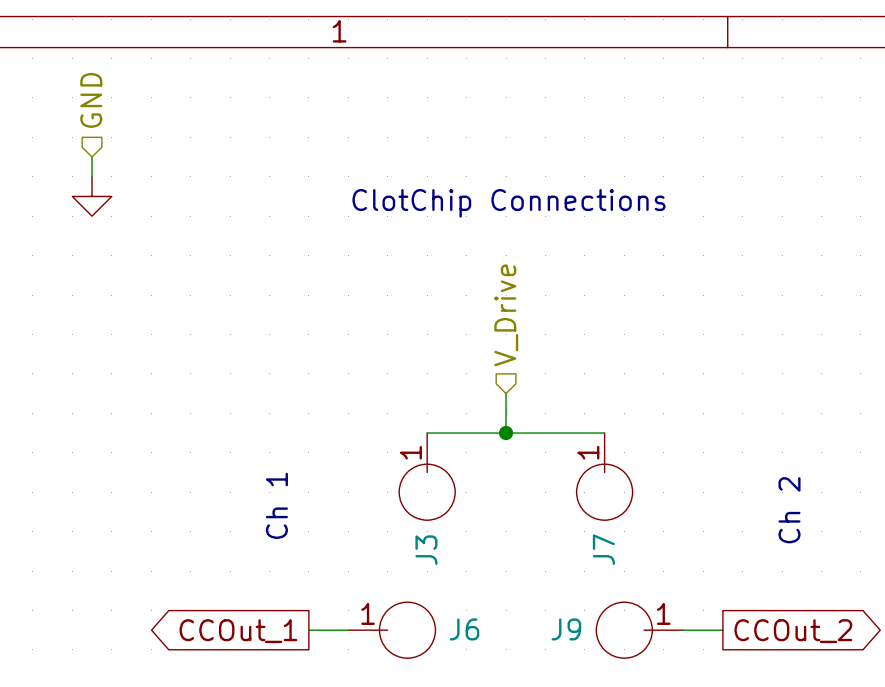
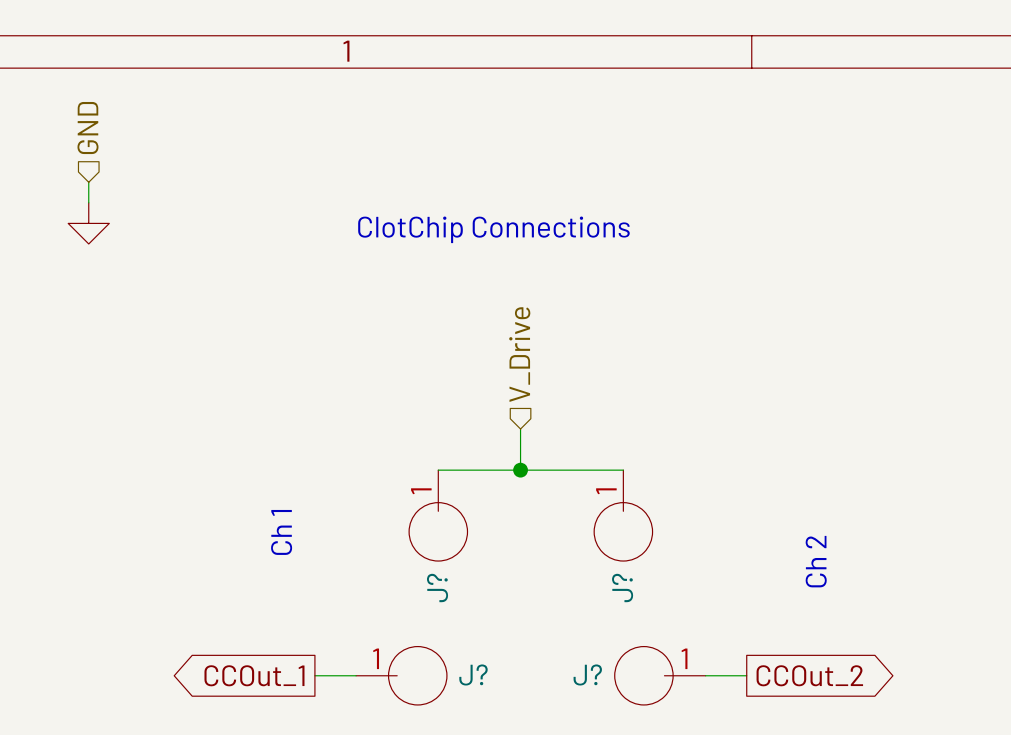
J7 name: J7 (603, 549) -> J? (622, 588)
J3 name: J3 (426, 550) -> J? (437, 588)
J6 name: J6 (464, 629) -> J? (473, 674)
J9 name: J9 (566, 629) -> J? (587, 674)

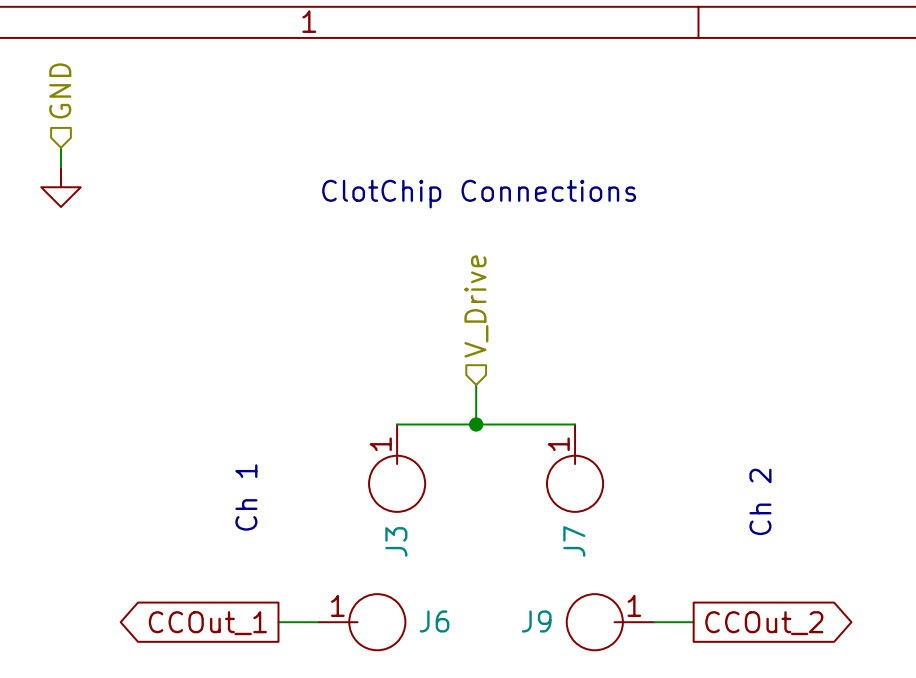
J? name: J? (437, 588) -> J3 (396, 541)
J? name: J? (622, 588) -> J7 (574, 541)
J? name: J? (473, 674) -> J6 (434, 621)
J? name: J? (587, 674) -> J9 (536, 621)

